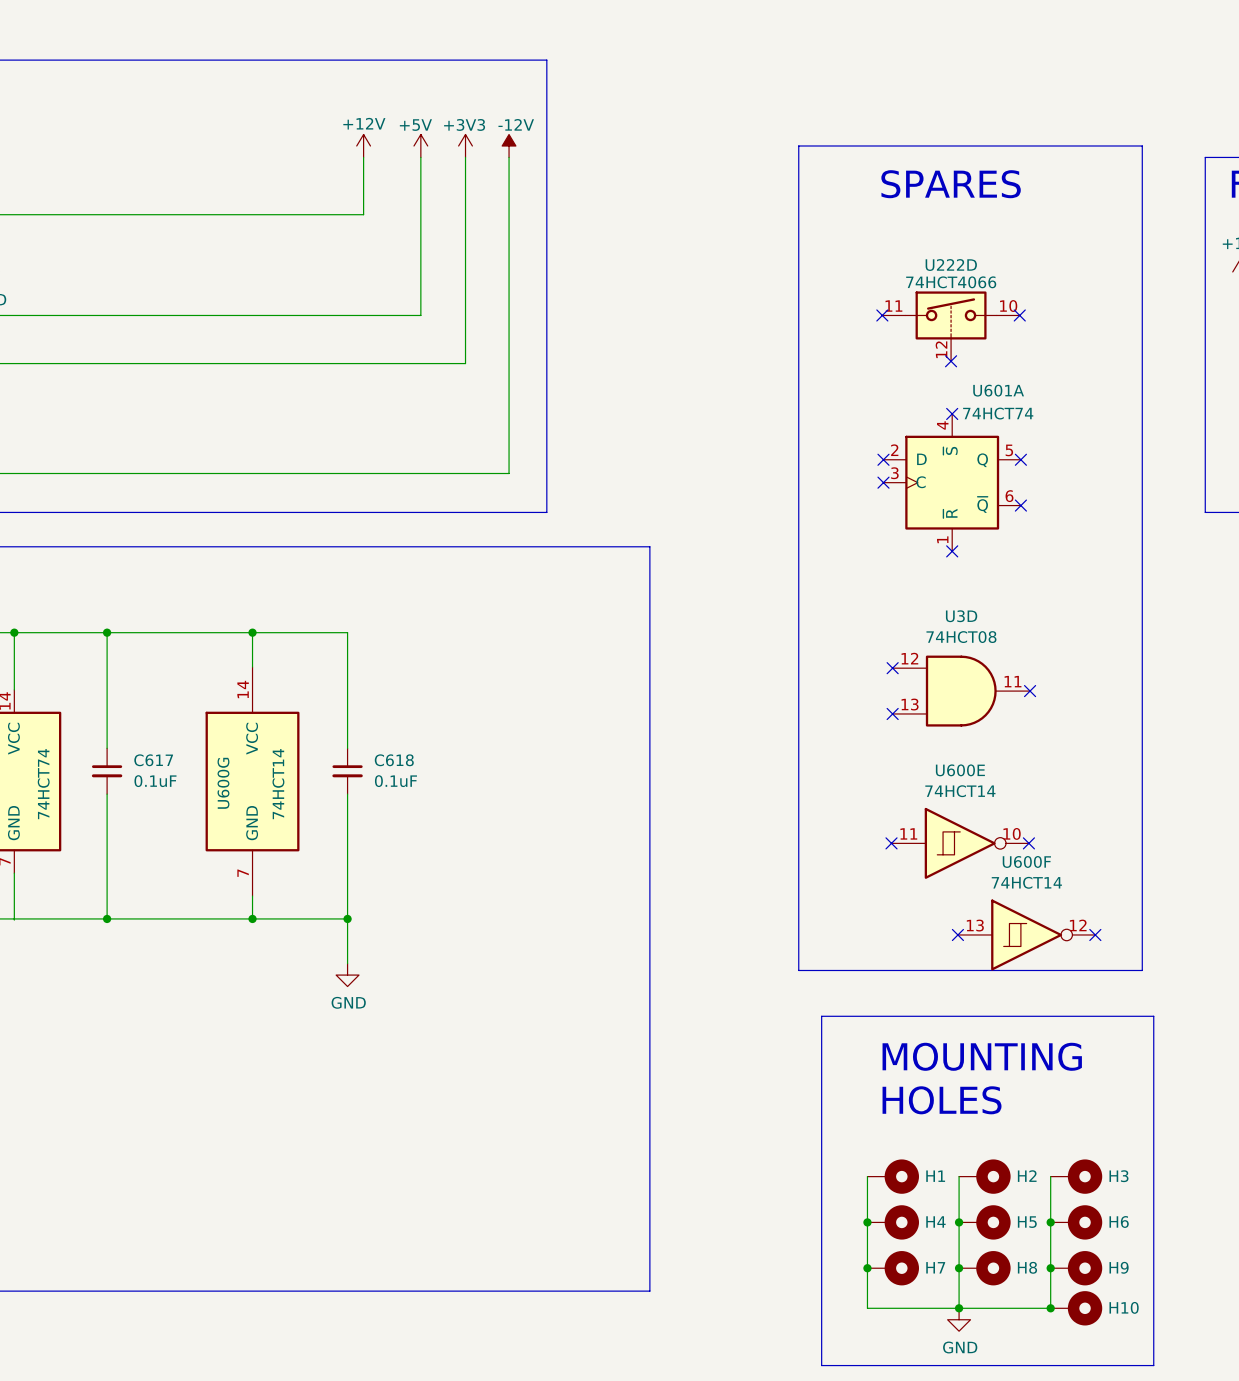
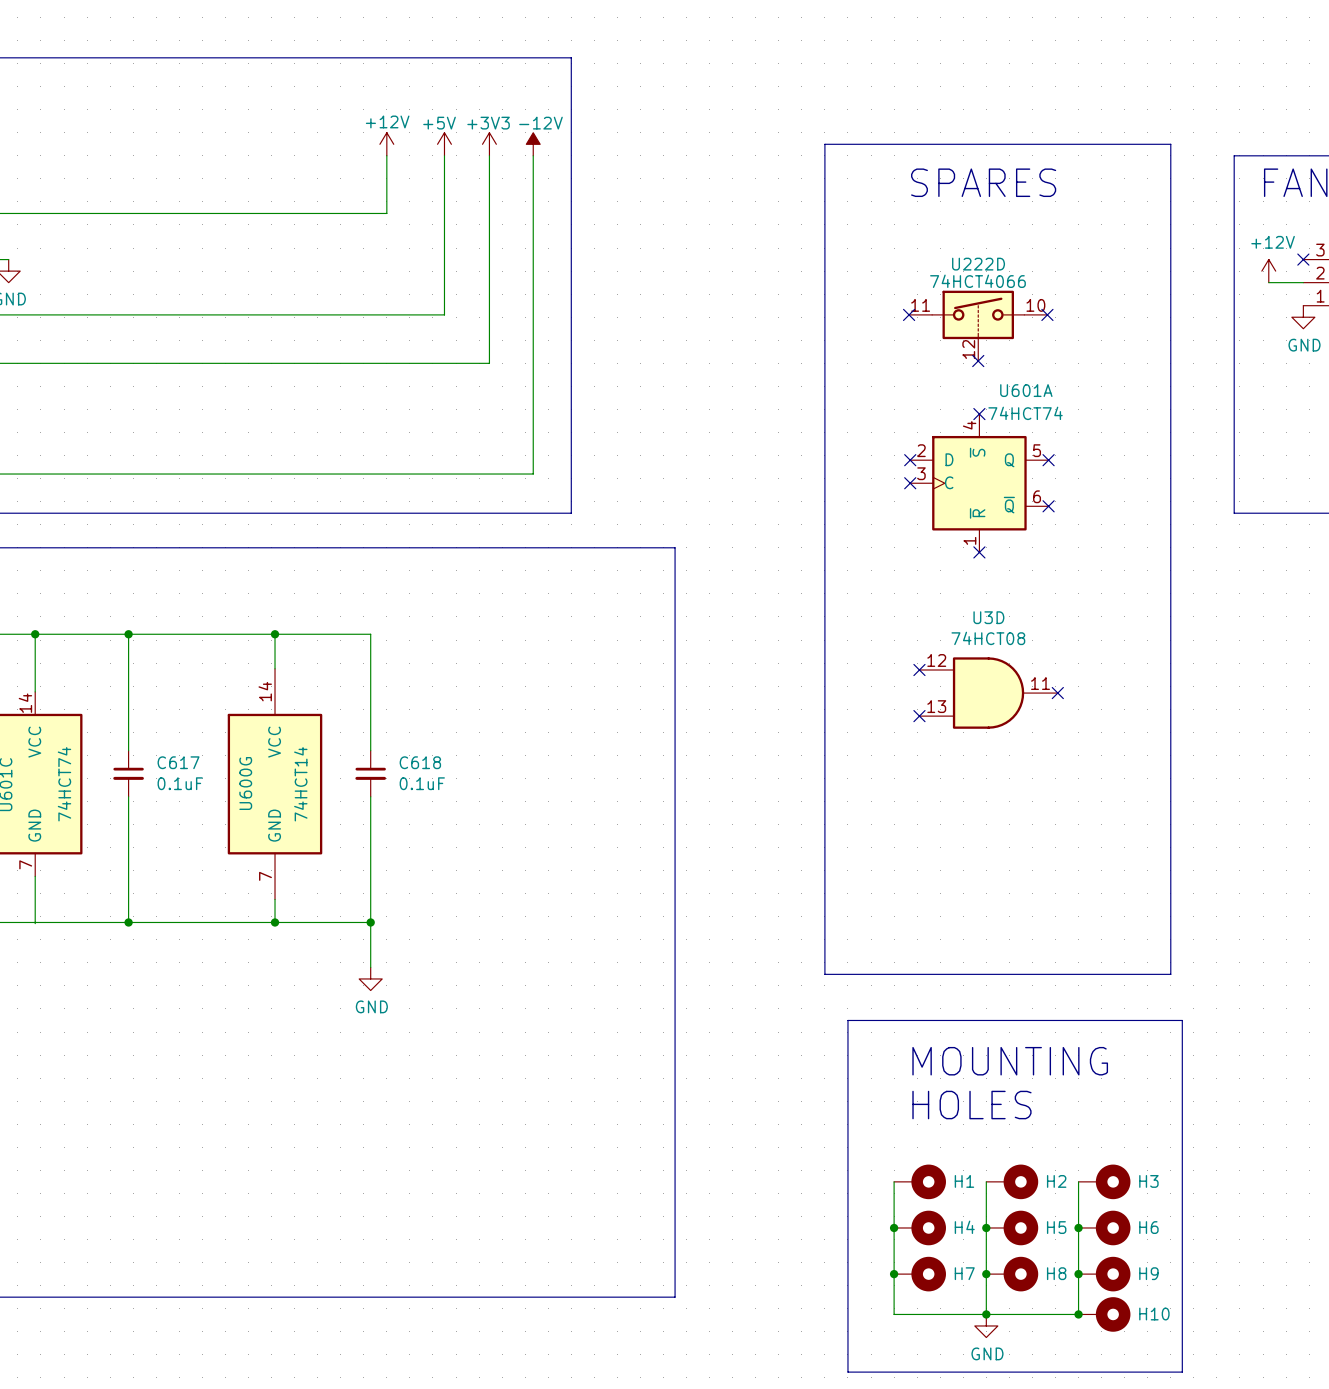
no-connect mark: (891, 843) -> none
U600E: 74HCT14 (960, 843) -> none
no-connect mark: (1028, 843) -> none
no-connect mark: (957, 934) -> none
U600F: 74HCT14 (1026, 934) -> none
no-connect mark: (1095, 934) -> none

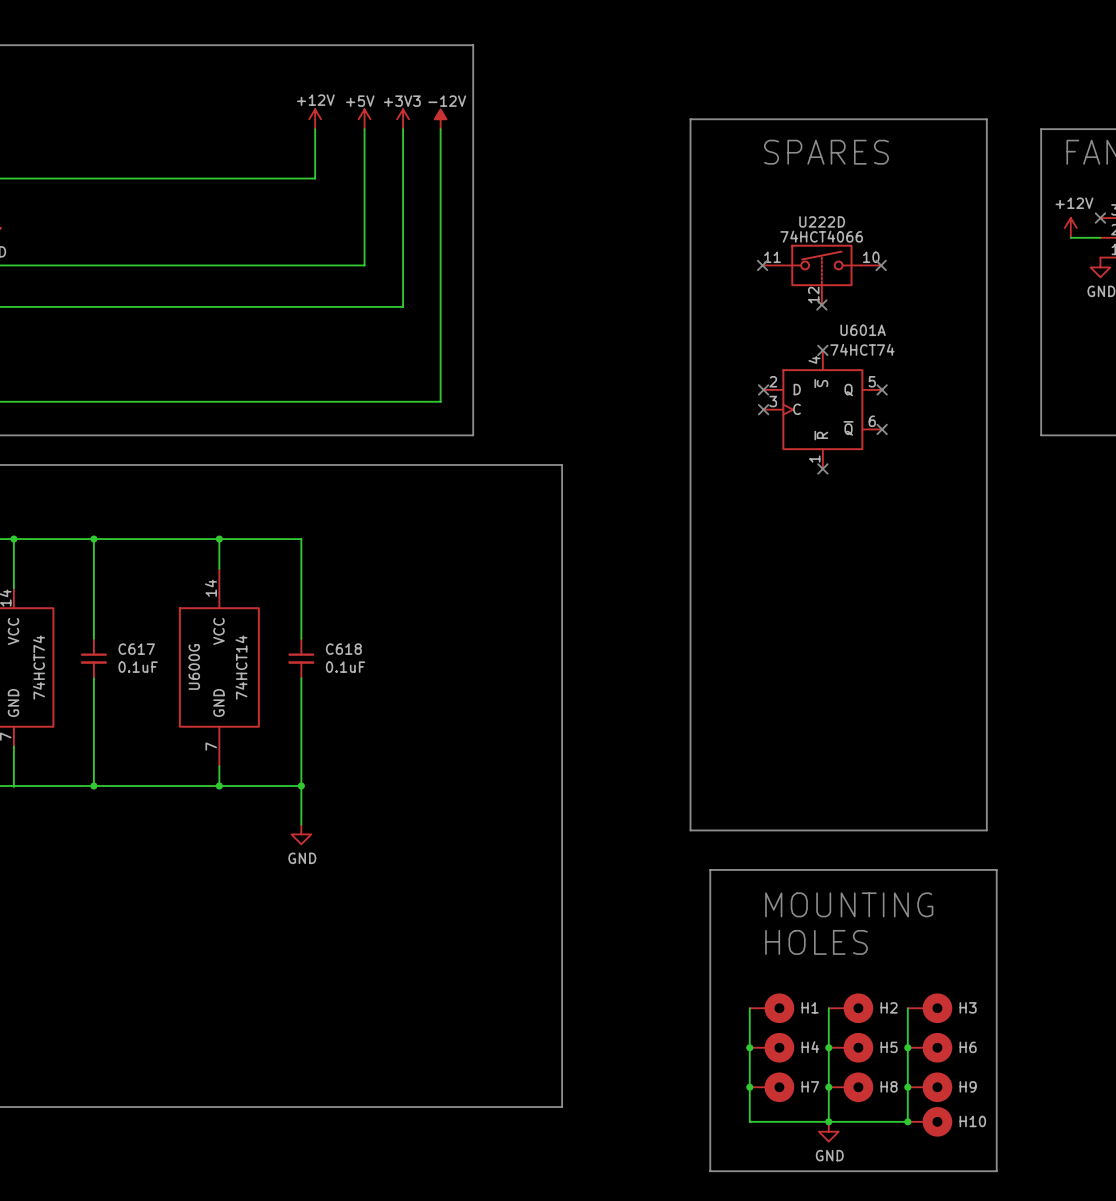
no-connect mark: (919, 670) -> none
U3D: 74HCT08 (988, 693) -> none
no-connect mark: (1057, 693) -> none
no-connect mark: (919, 716) -> none

